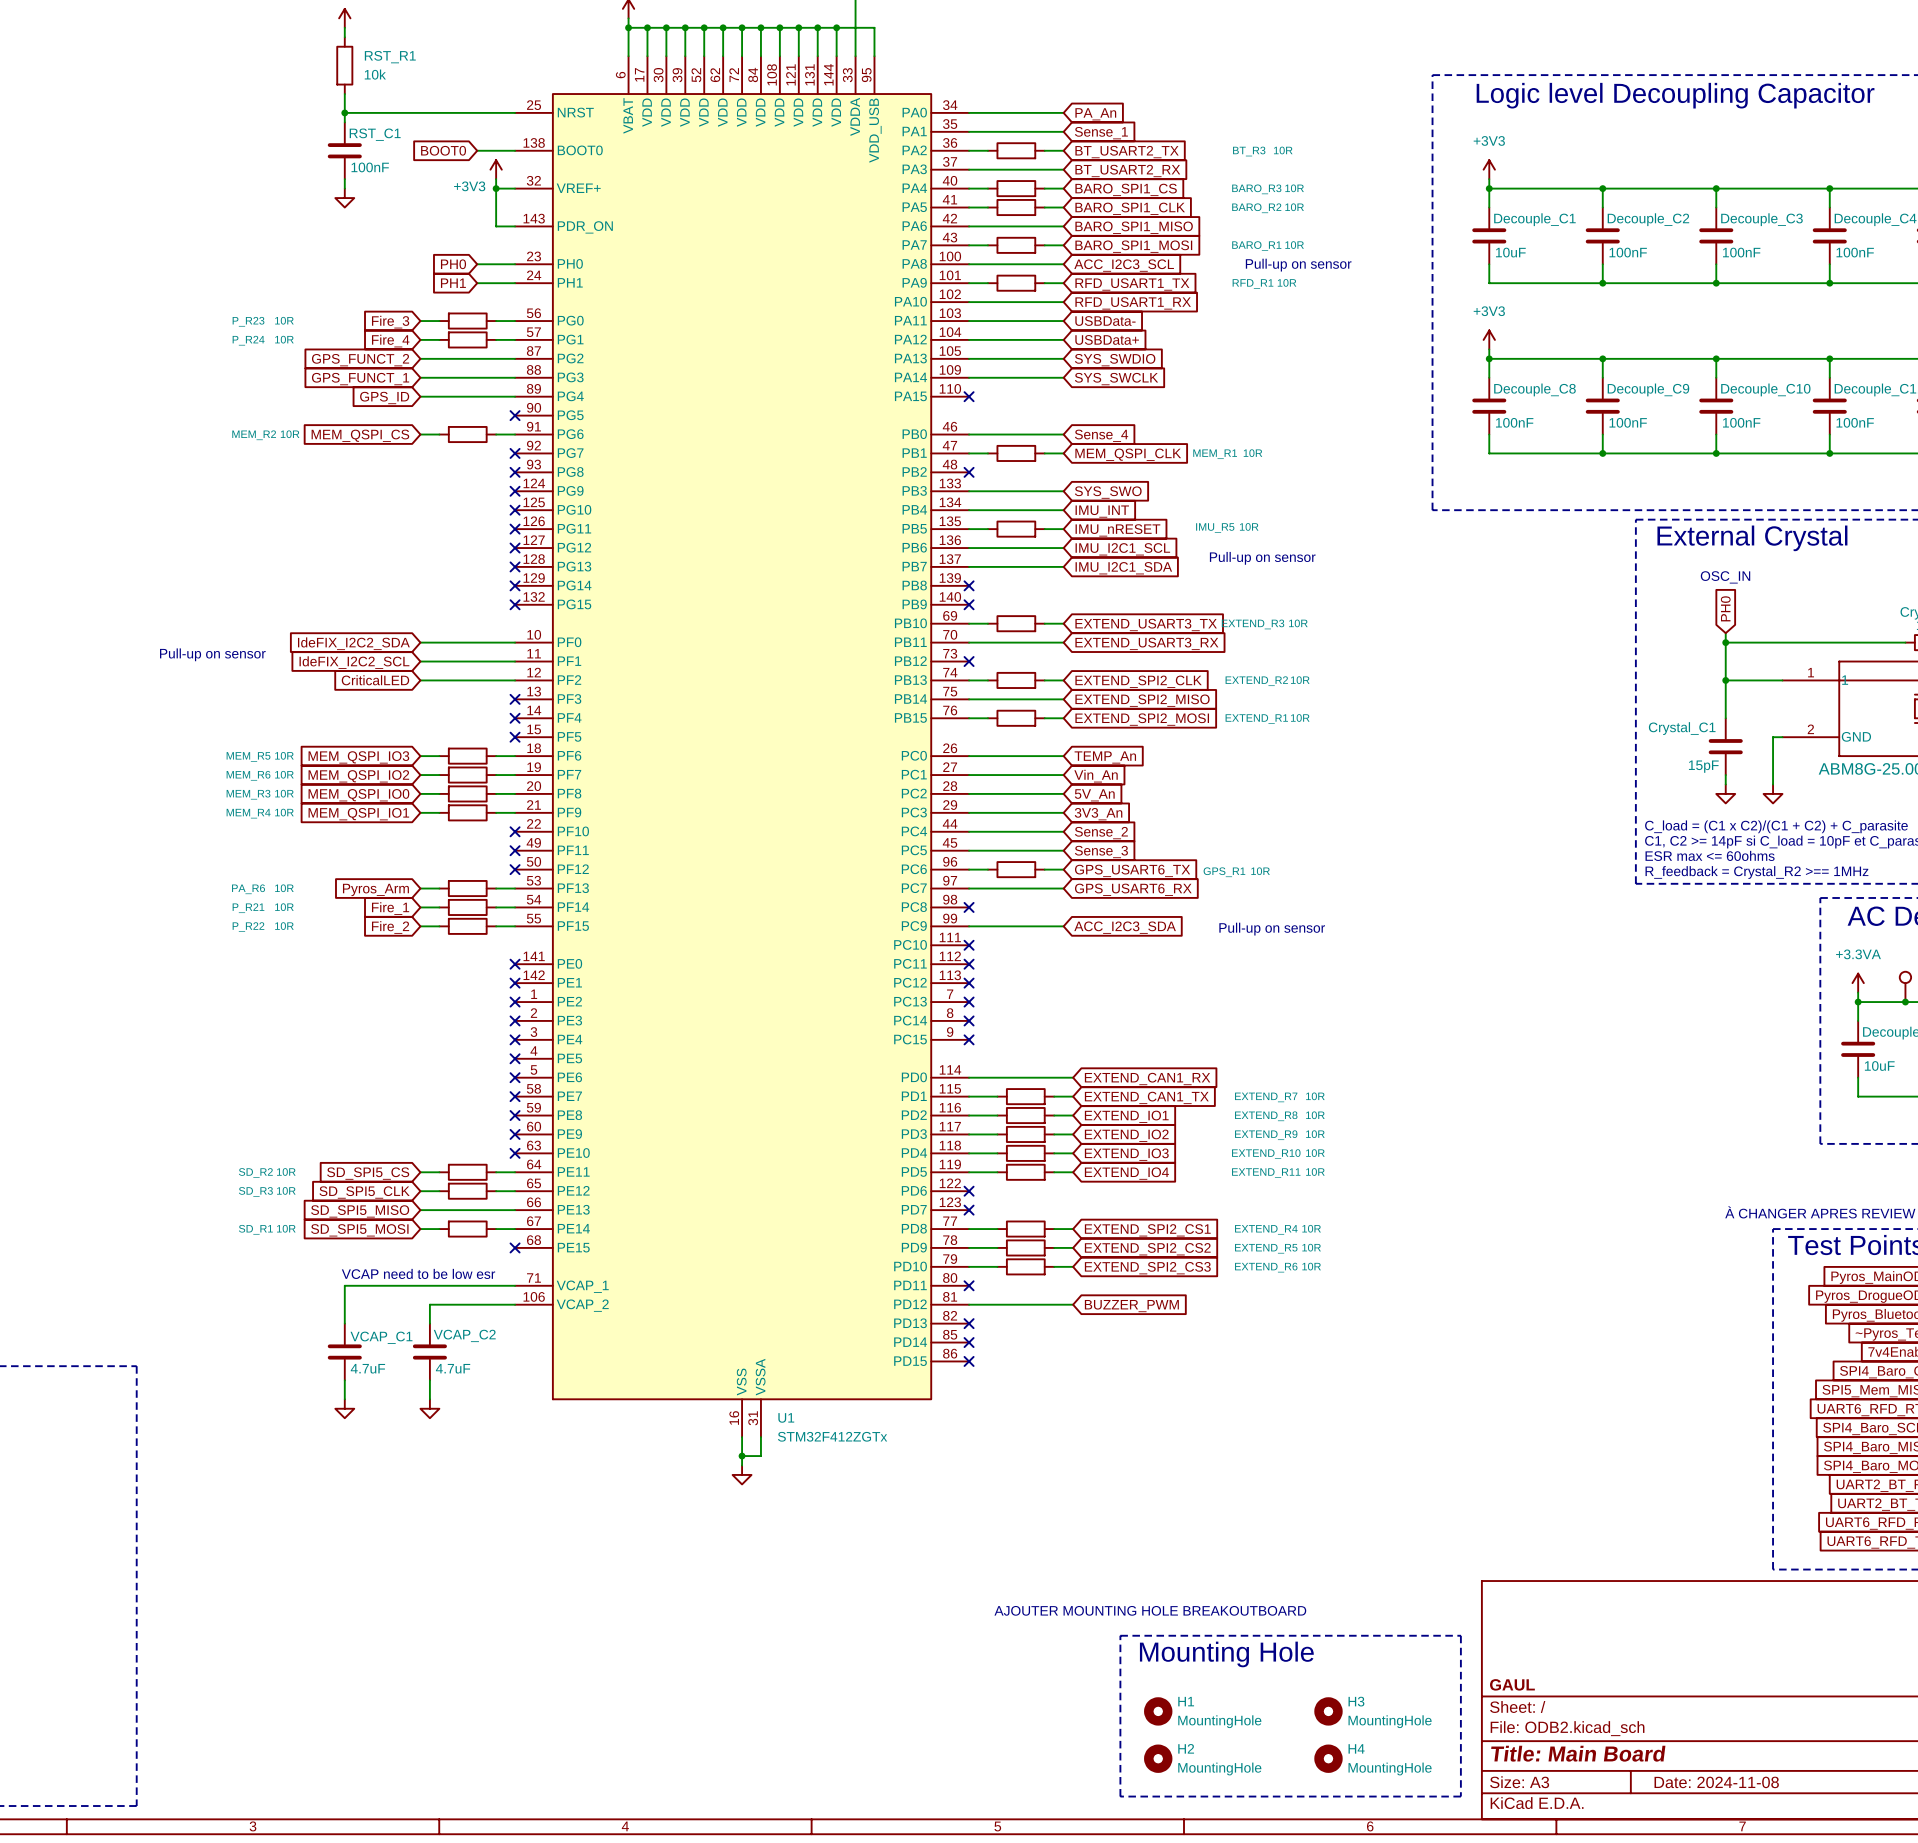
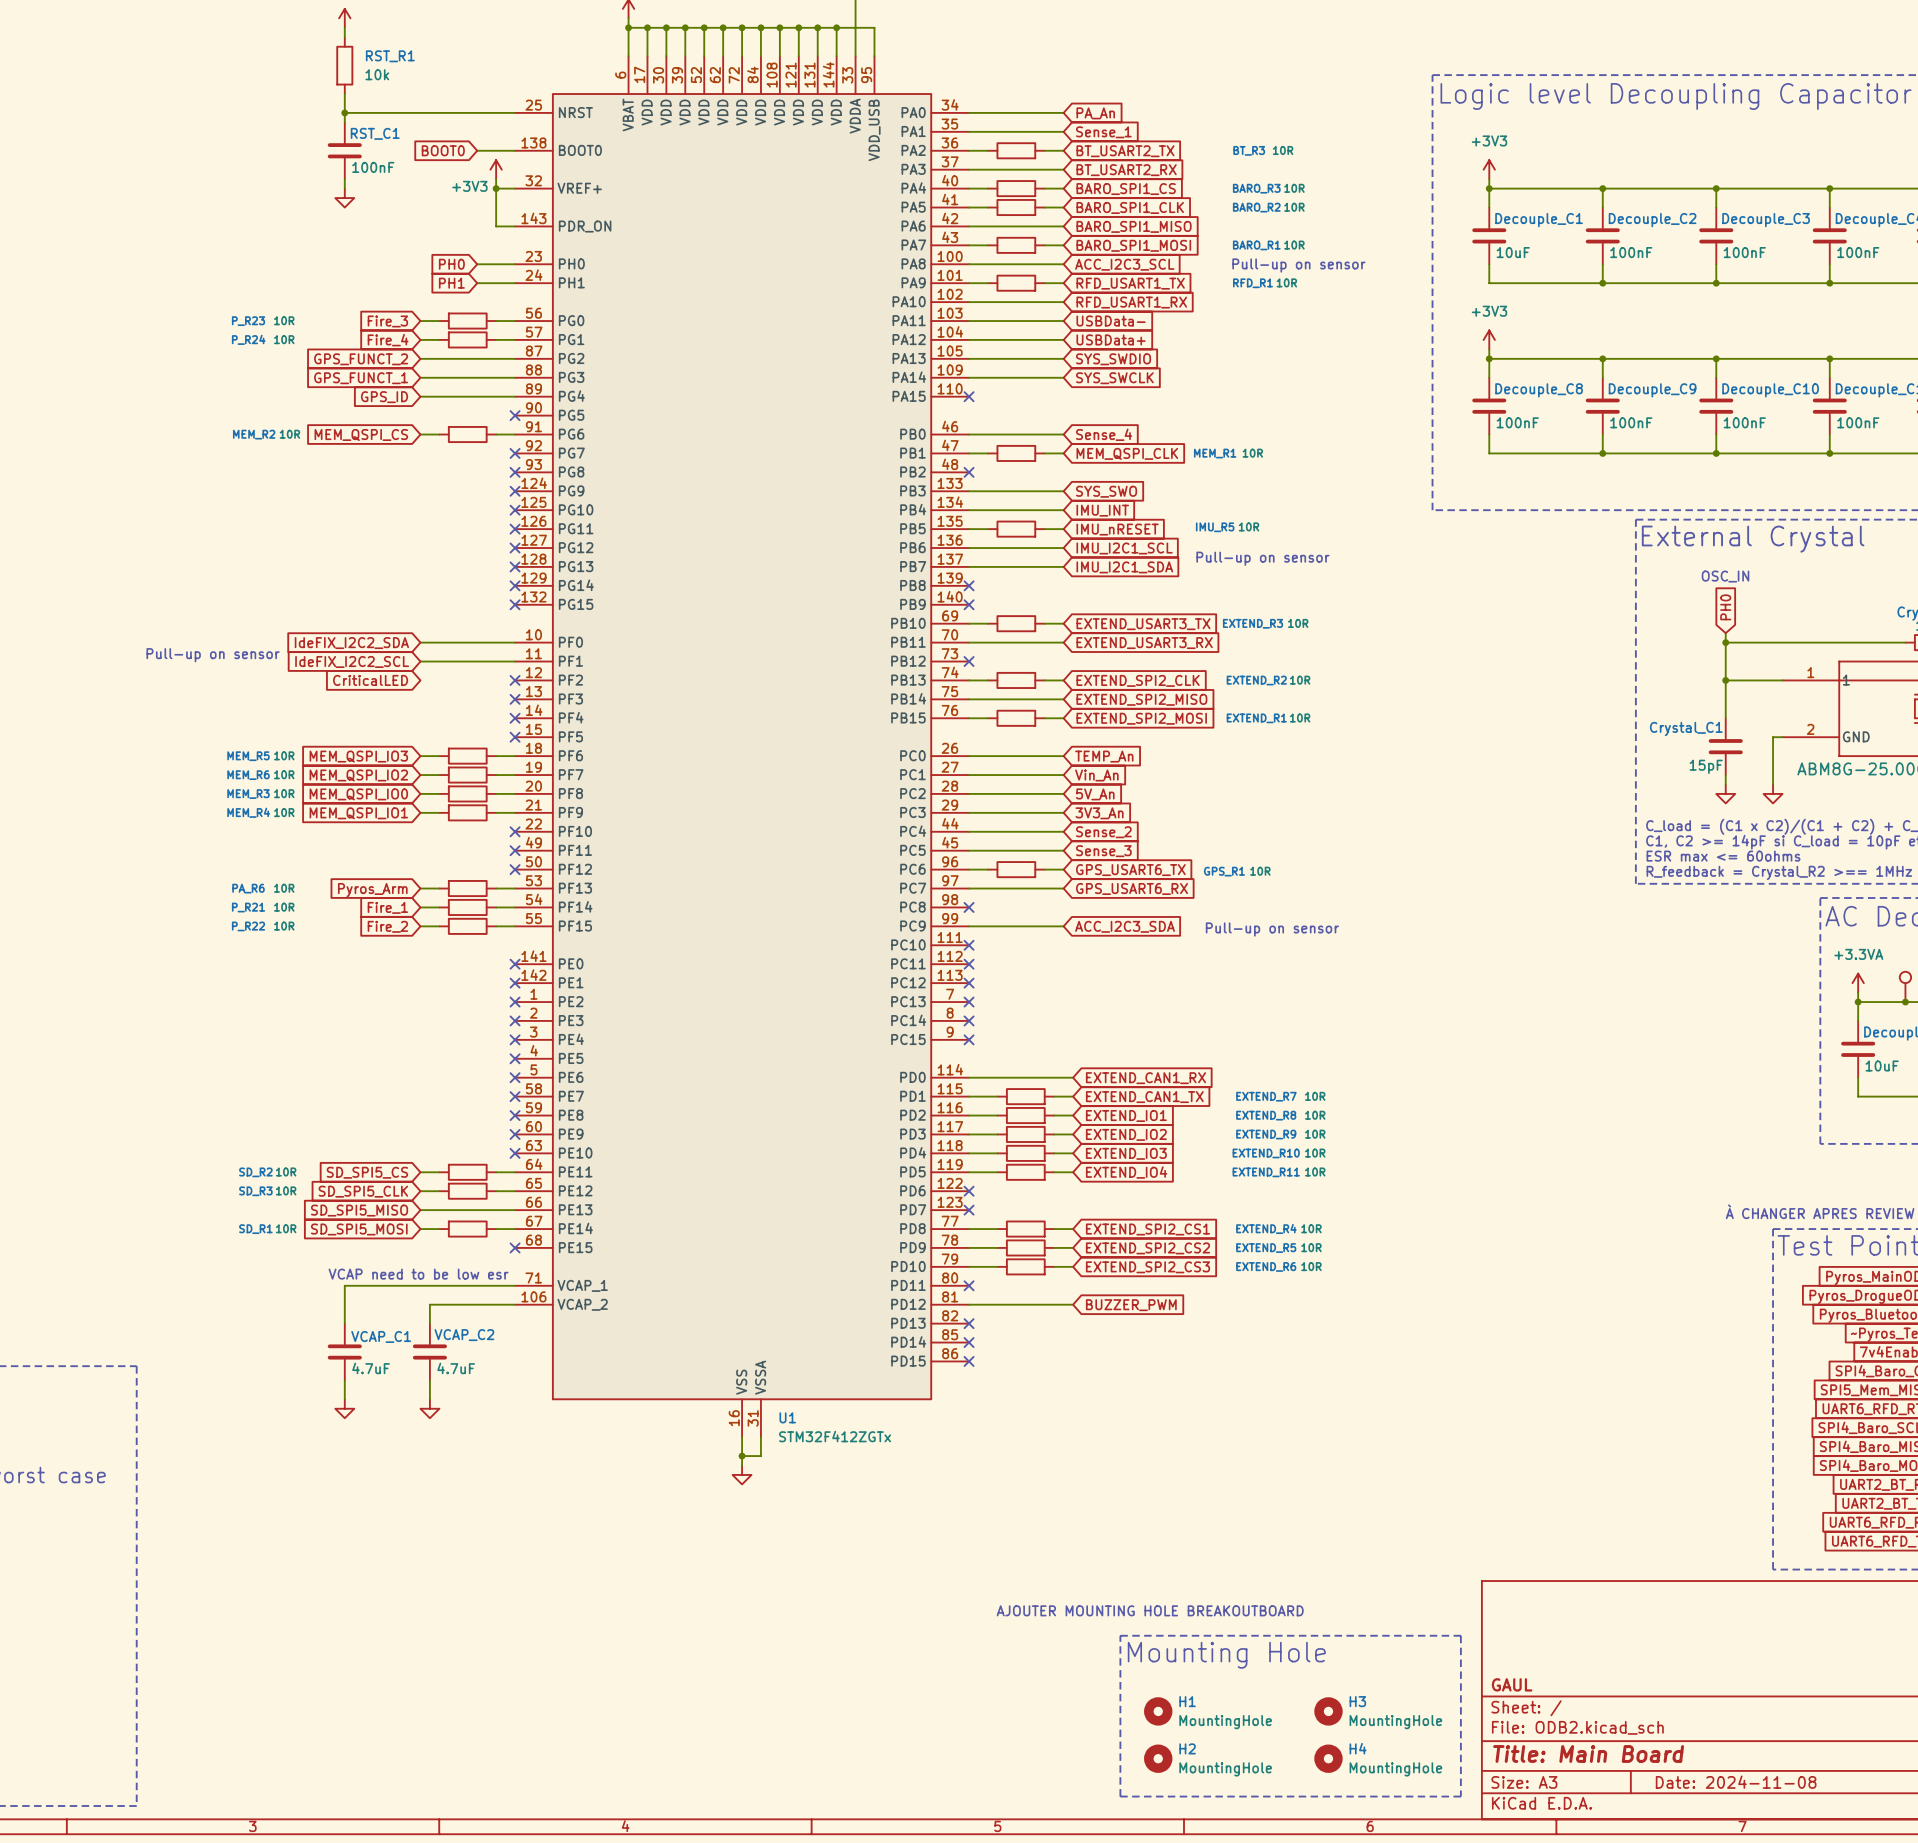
wire: (420, 680) (515, 680) -> none
no-connect mark: none -> (515, 680)

